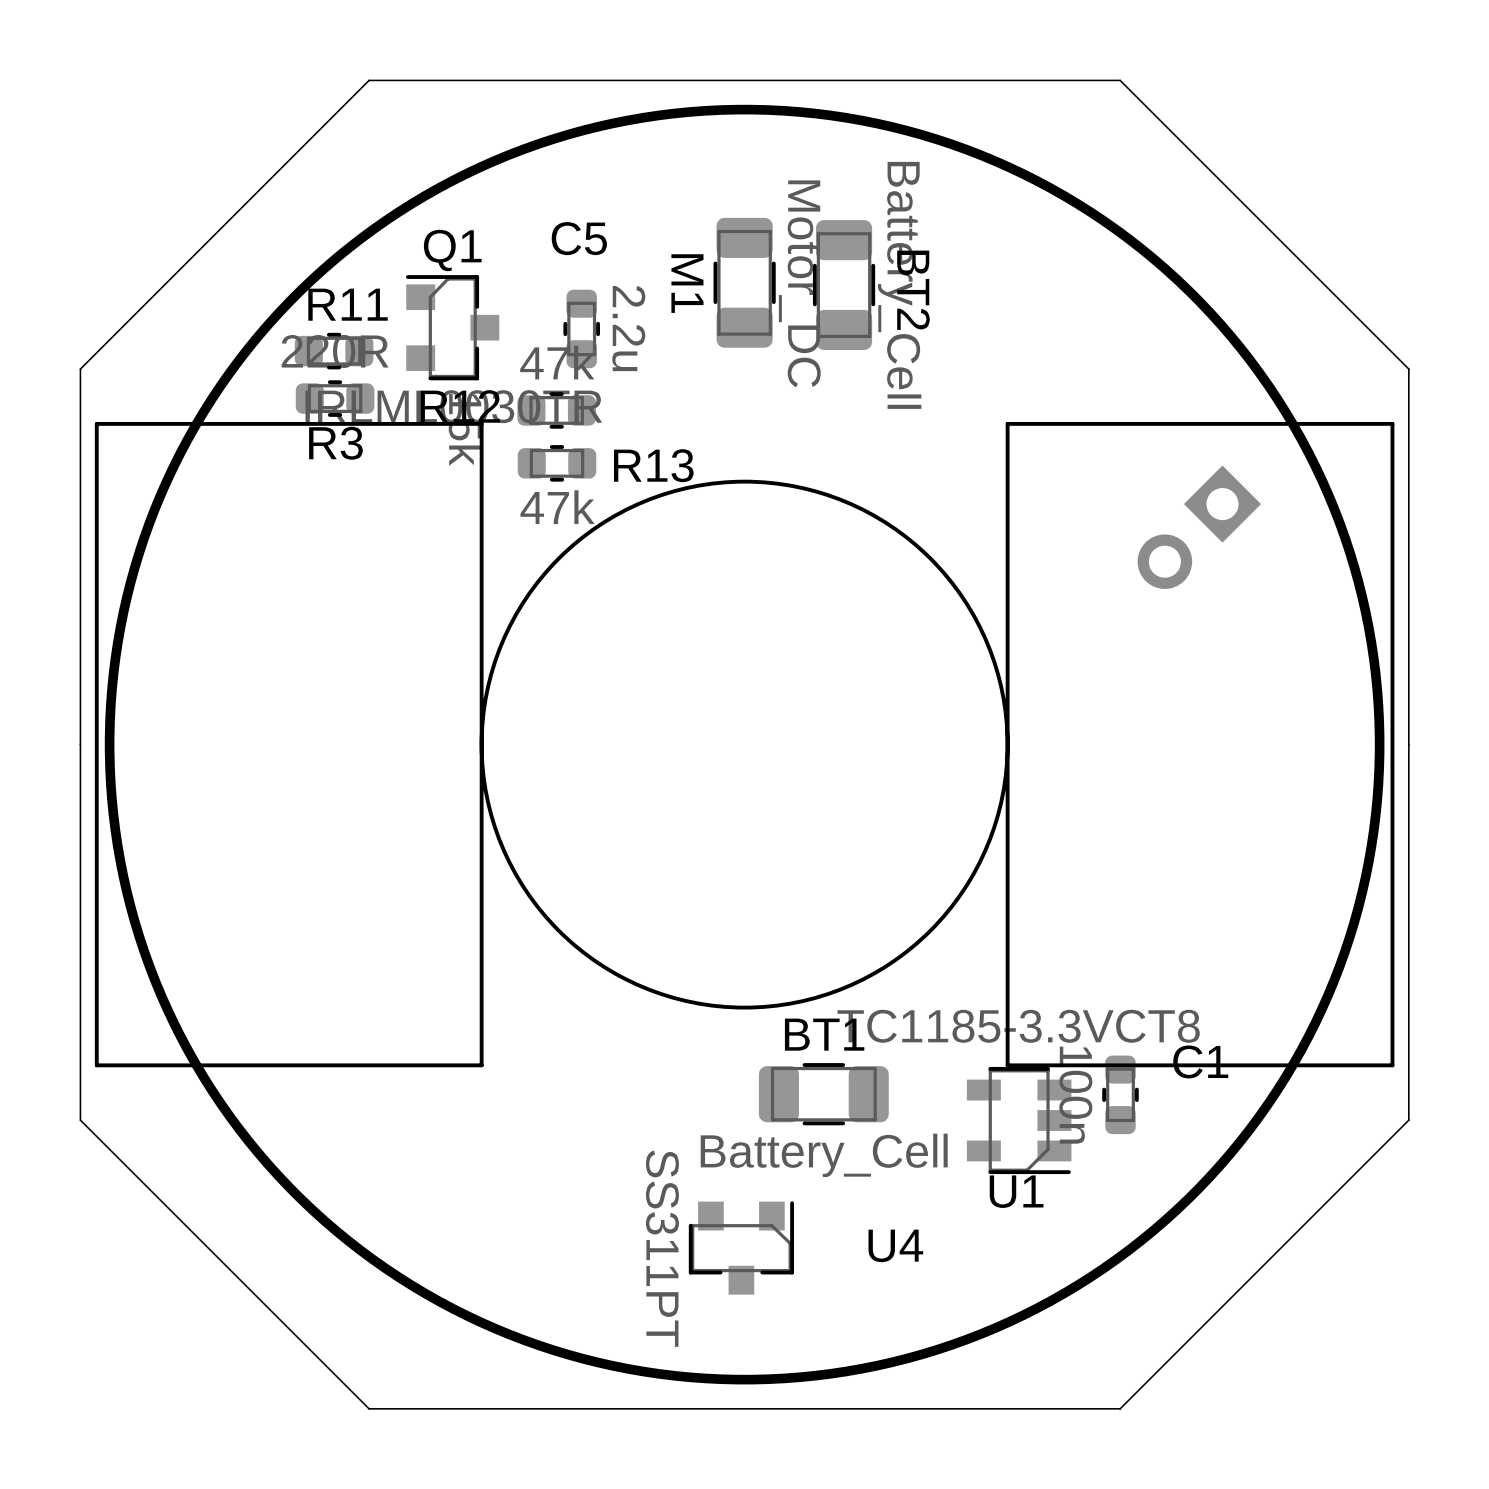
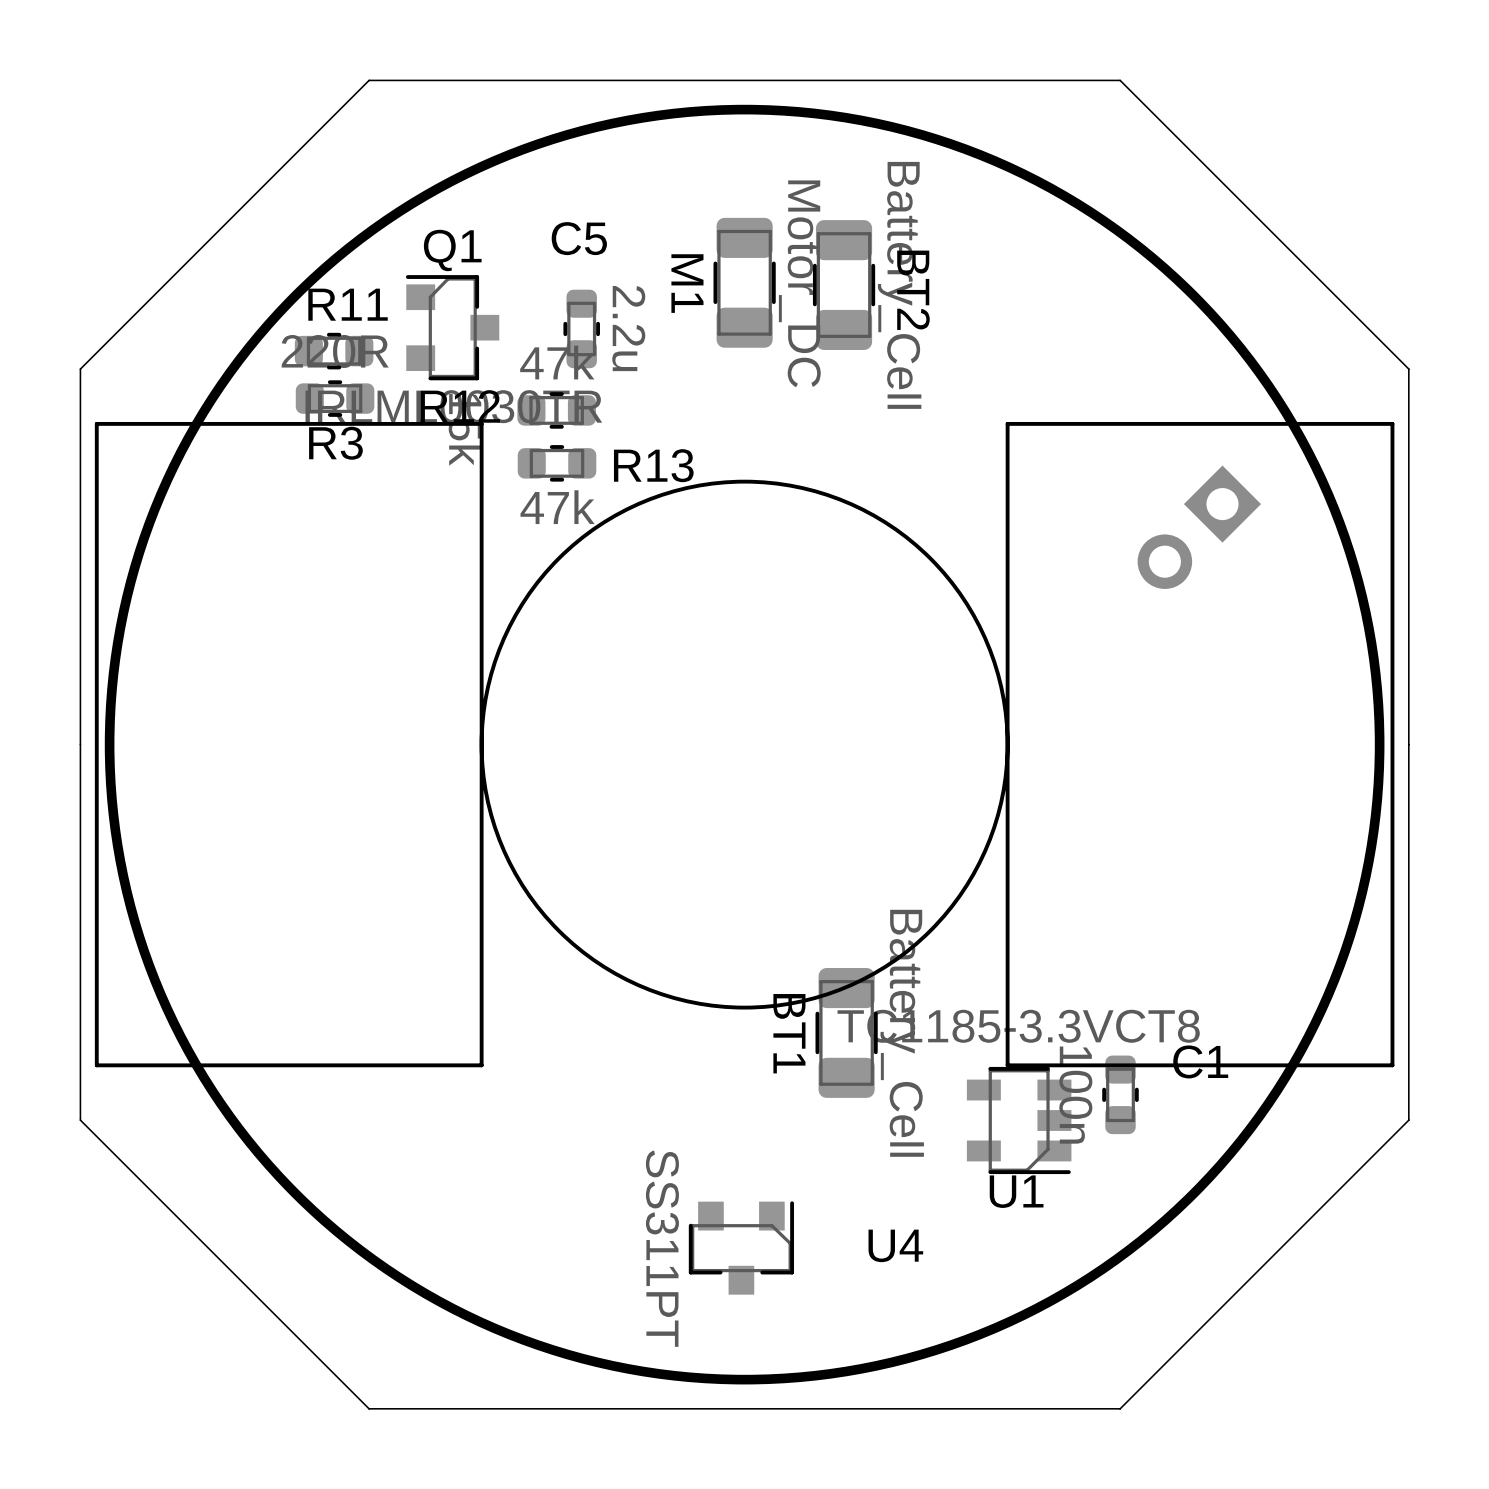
BT1 name position: BT1 (824, 1034) -> BT1 (789, 1033)
BT1 rotation: 0° (823, 1094) -> 90° clockwise (846, 1032)
BT1 value position: Battery_Cell (824, 1155) -> Battery_Cell (902, 1033)

